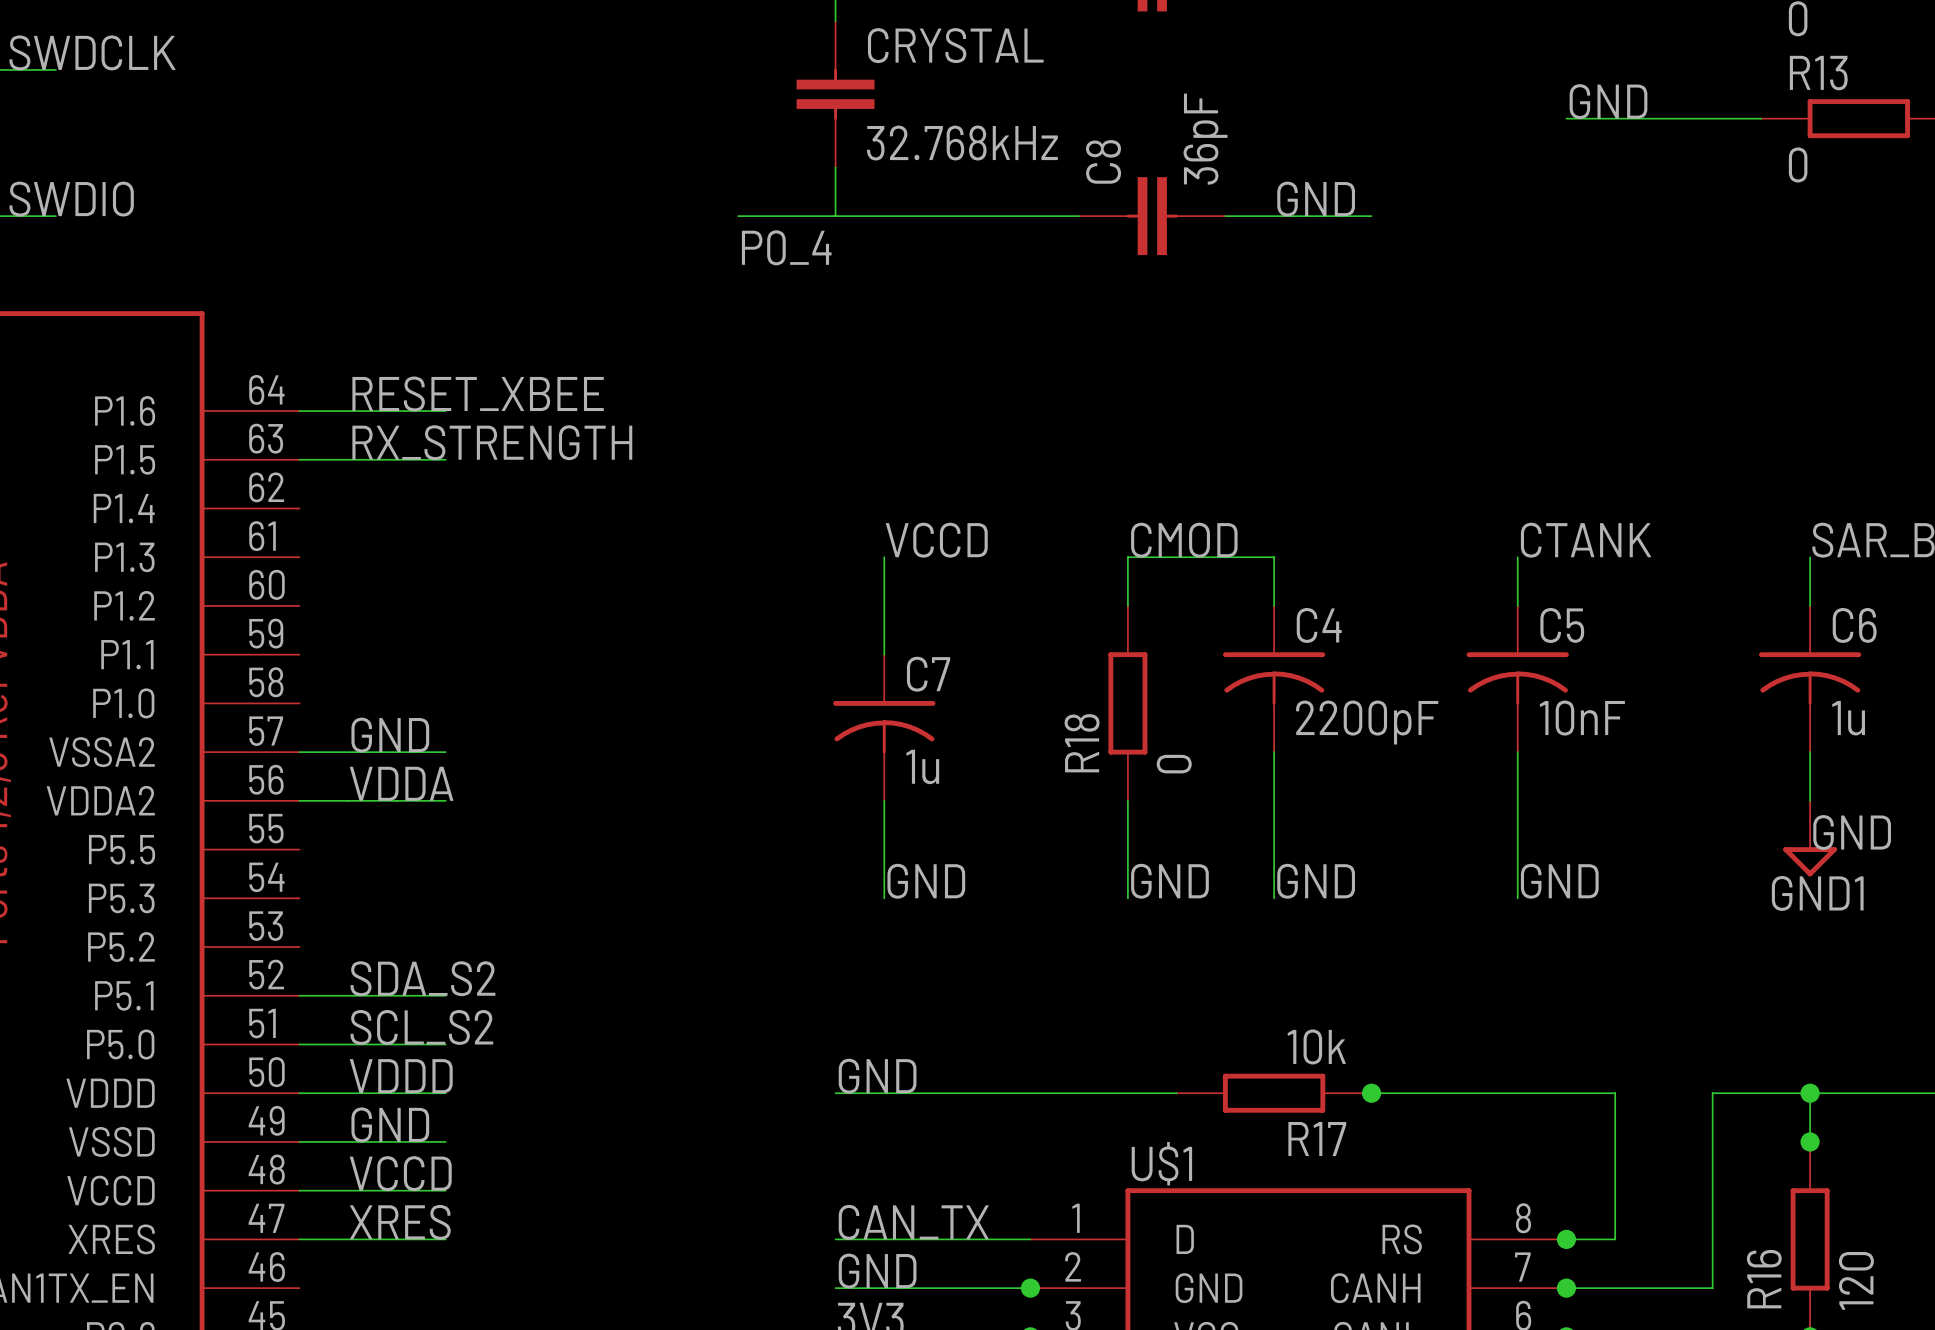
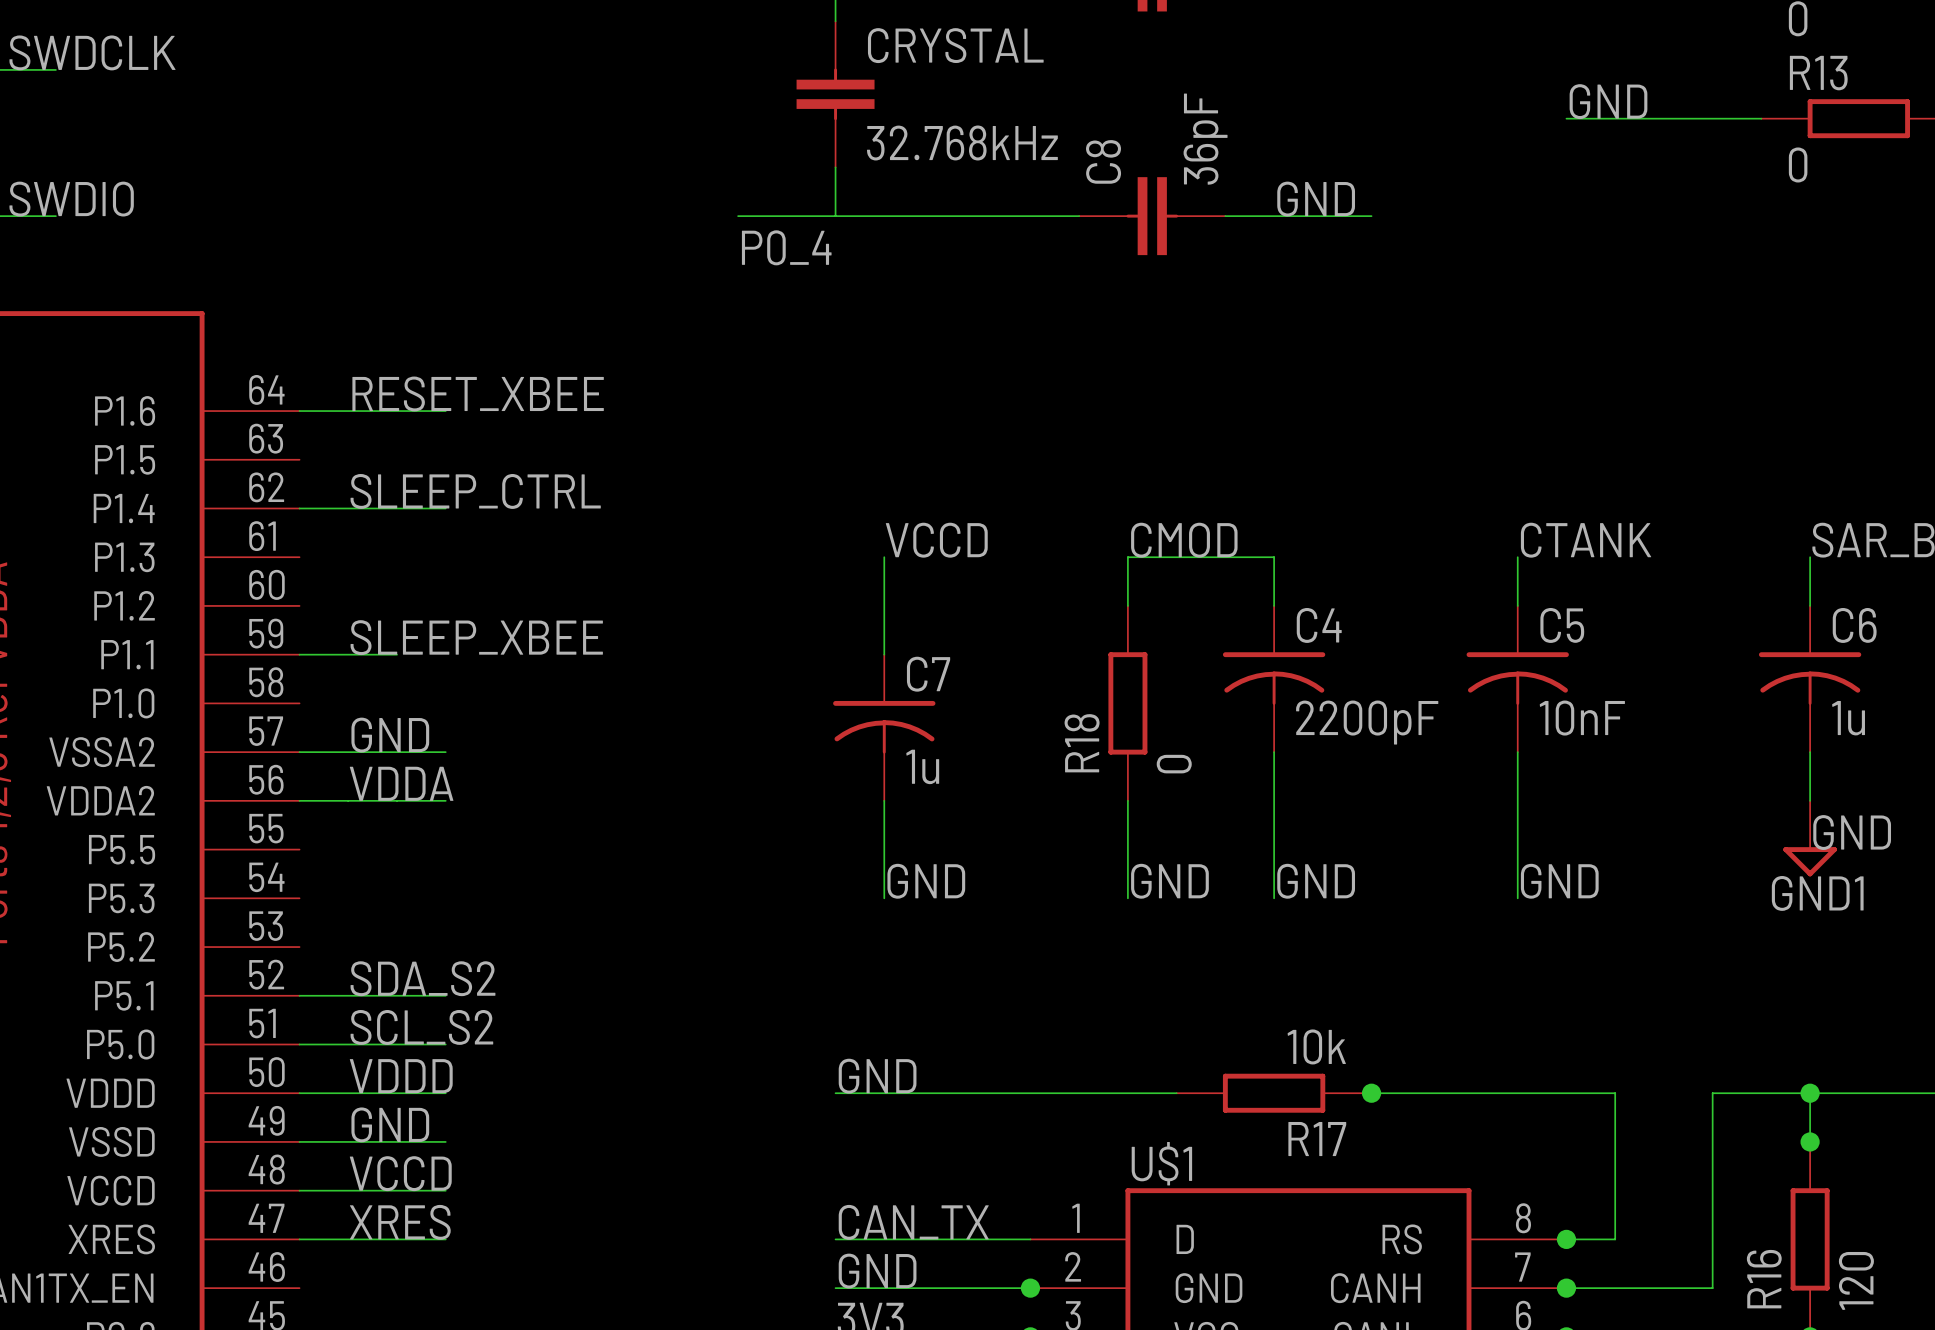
label: RX_STRENGTH (492, 442) -> none
wire: (299, 459) (445, 459) -> (299, 508) (445, 508)
label: none -> SLEEP_CTRL (475, 491)
label: none -> SLEEP_XBEE (476, 637)
wire: none -> (299, 654) (397, 654)

